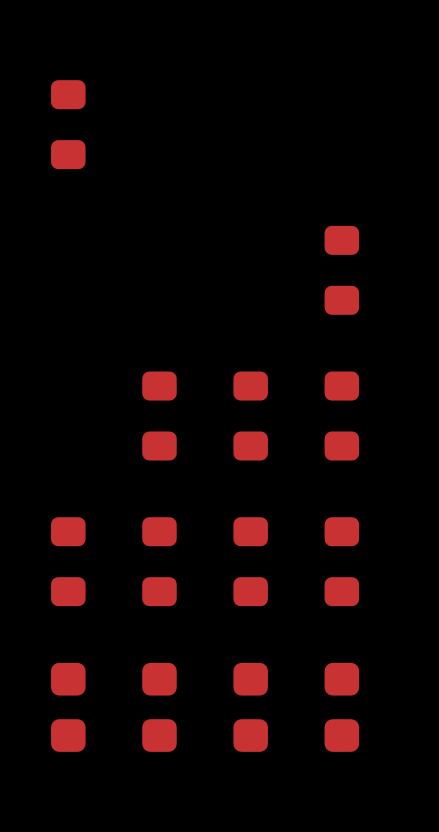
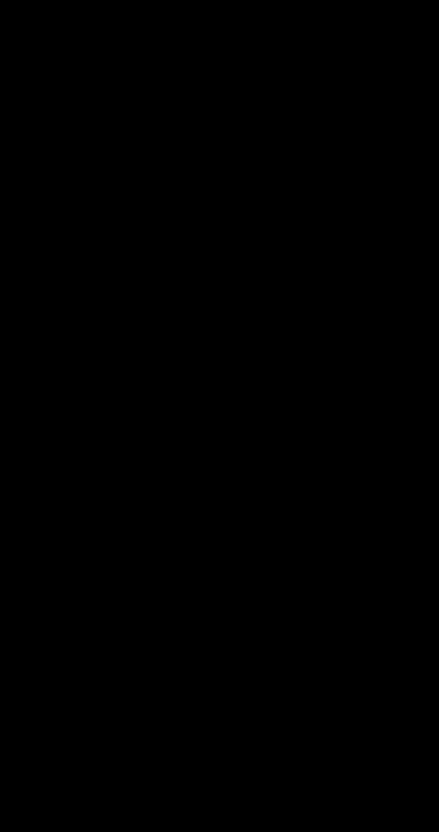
part: (68, 124) -> none
part: (341, 270) -> none
part: (159, 416) -> none
part: (250, 416) -> none
part: (341, 416) -> none
part: (68, 561) -> none
part: (159, 561) -> none
part: (250, 561) -> none
part: (341, 561) -> none
part: (68, 707) -> none
part: (159, 707) -> none
part: (250, 707) -> none
part: (341, 707) -> none

